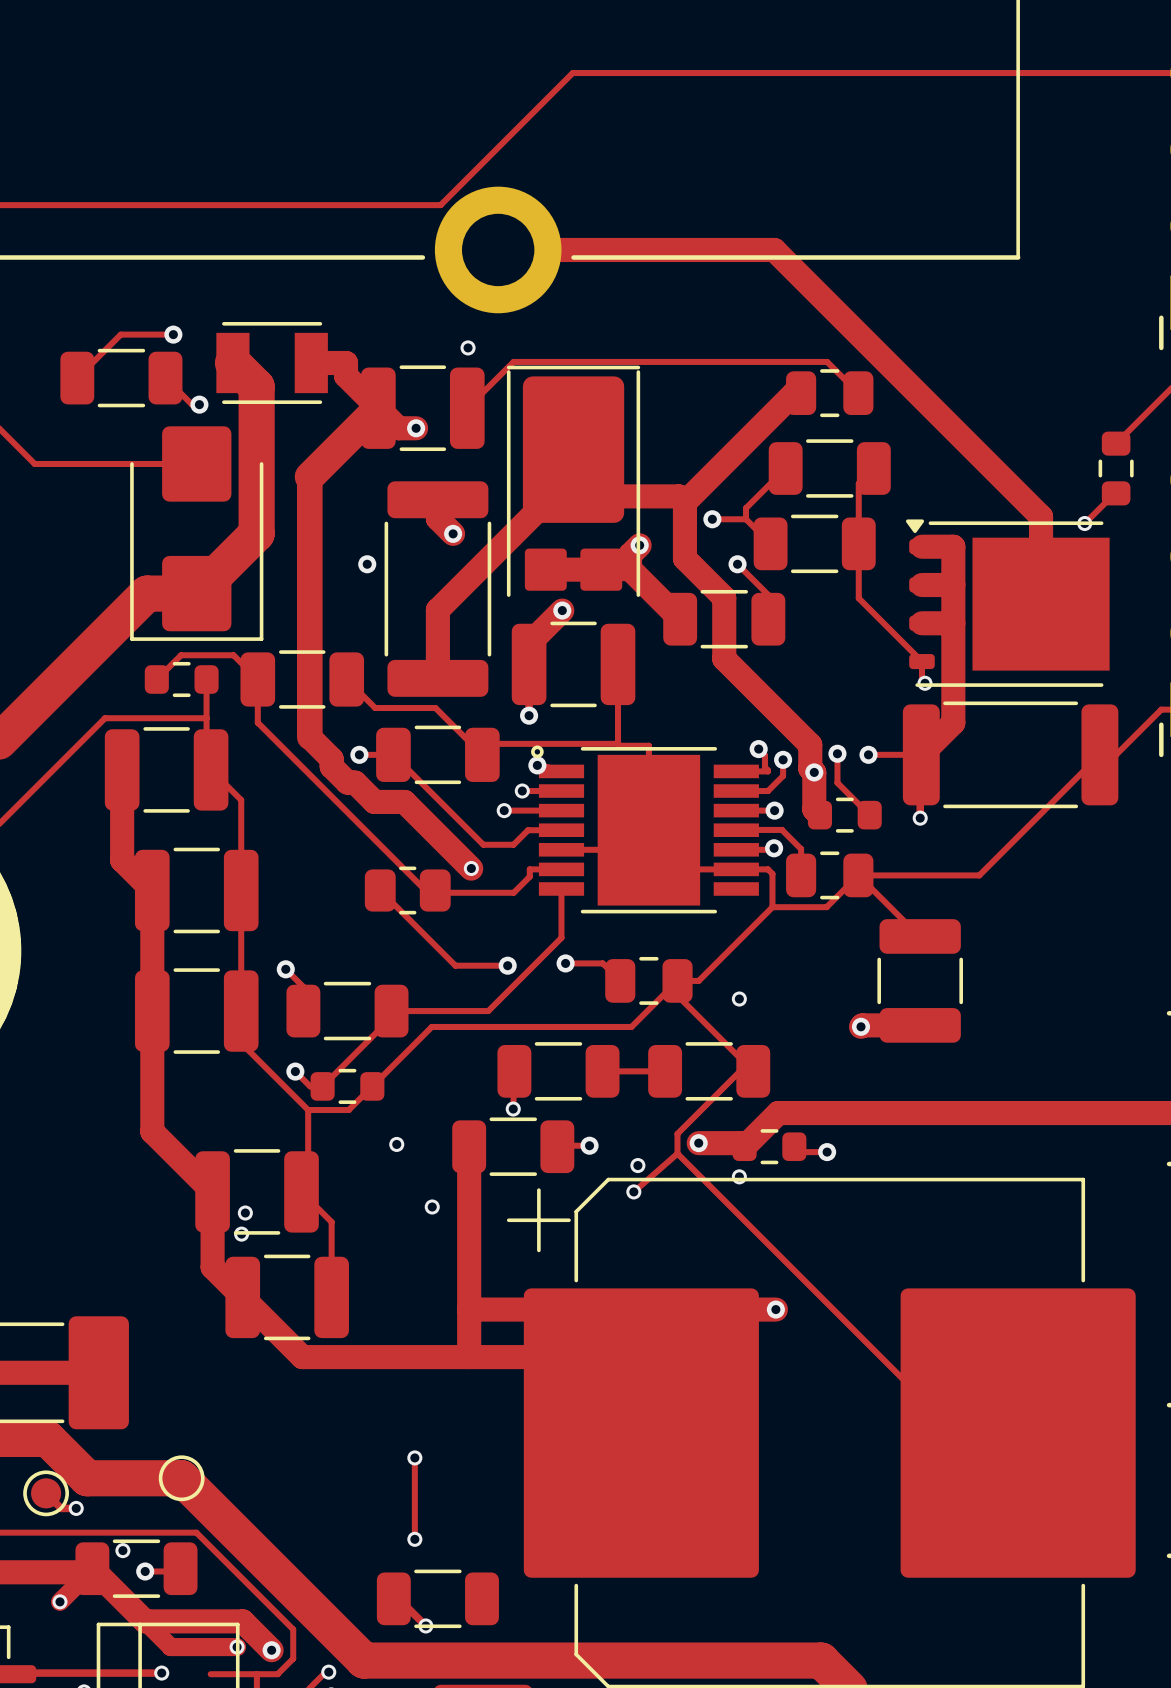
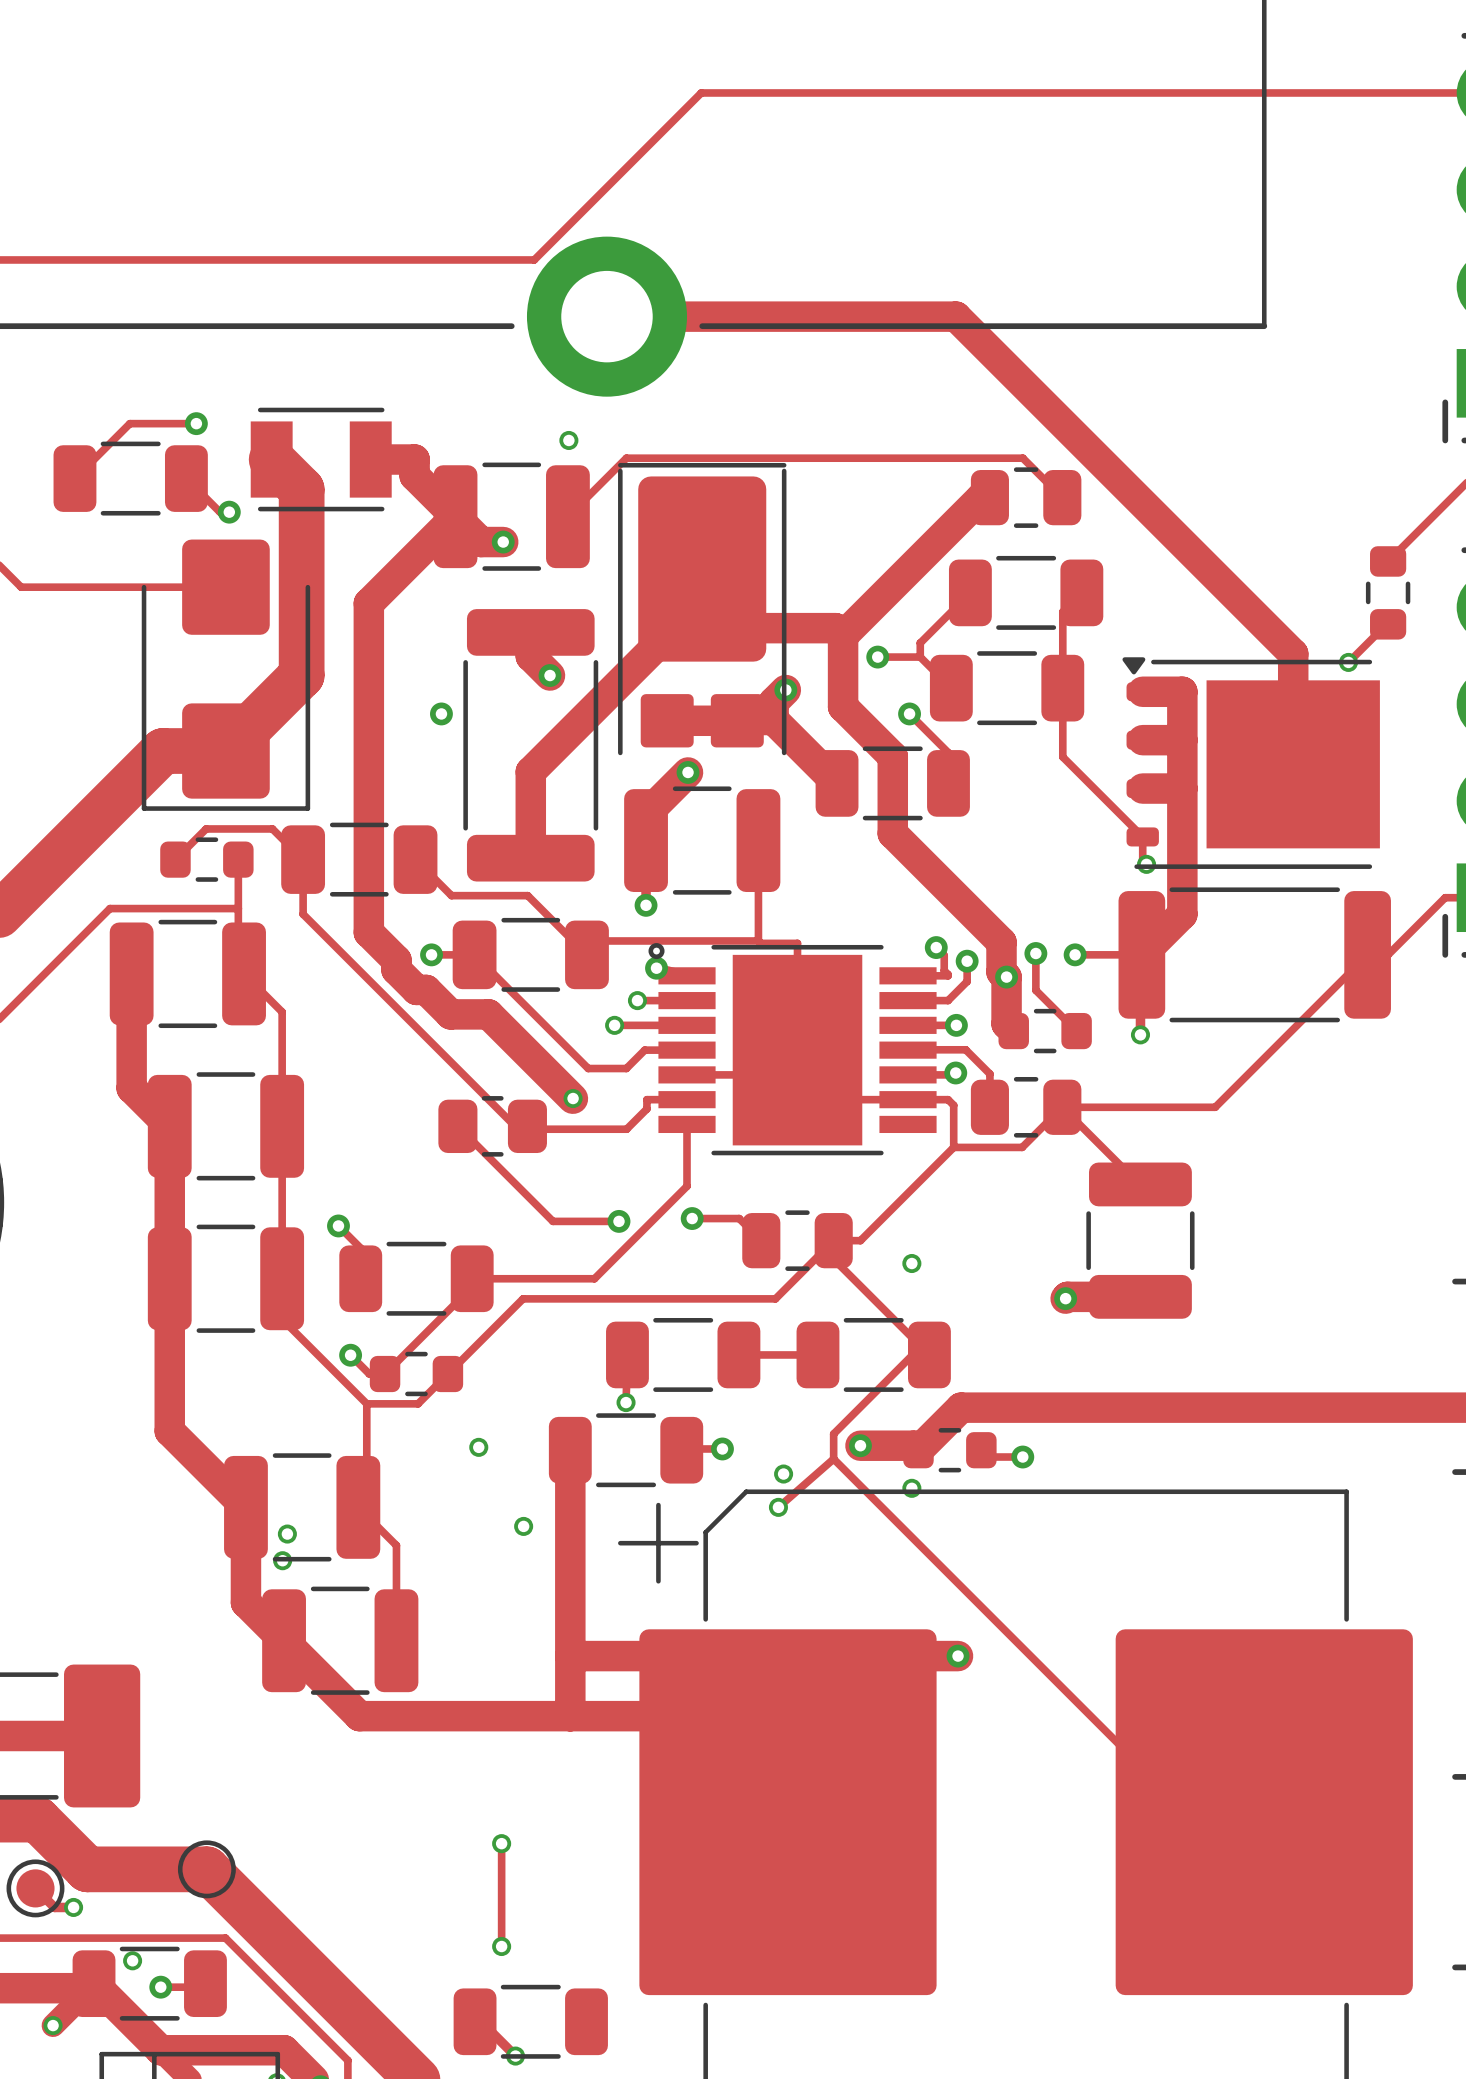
track width: thick (378, 408) (309, 476) (309, 737) -> thin (455, 516) (368, 603) (368, 932)

